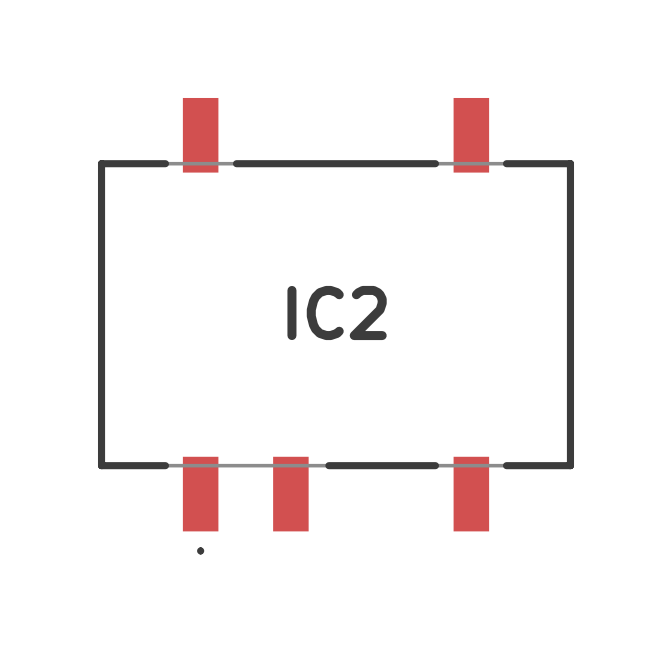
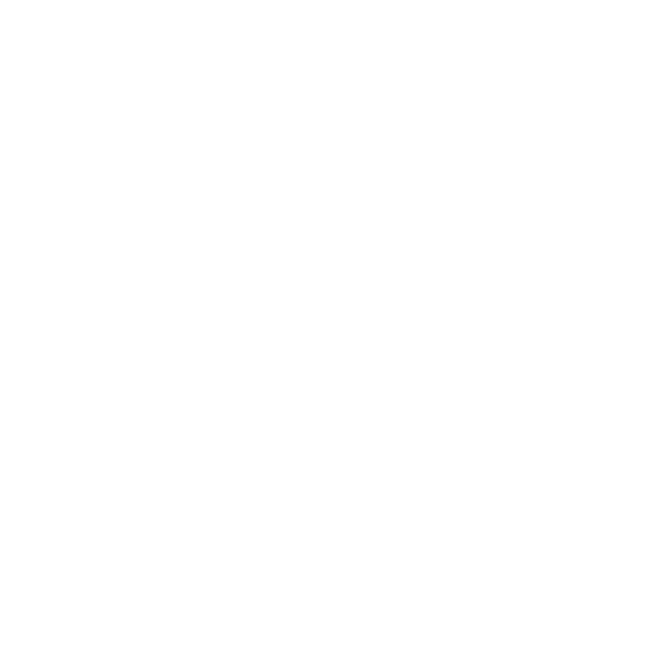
IC2: (336, 326) -> none

